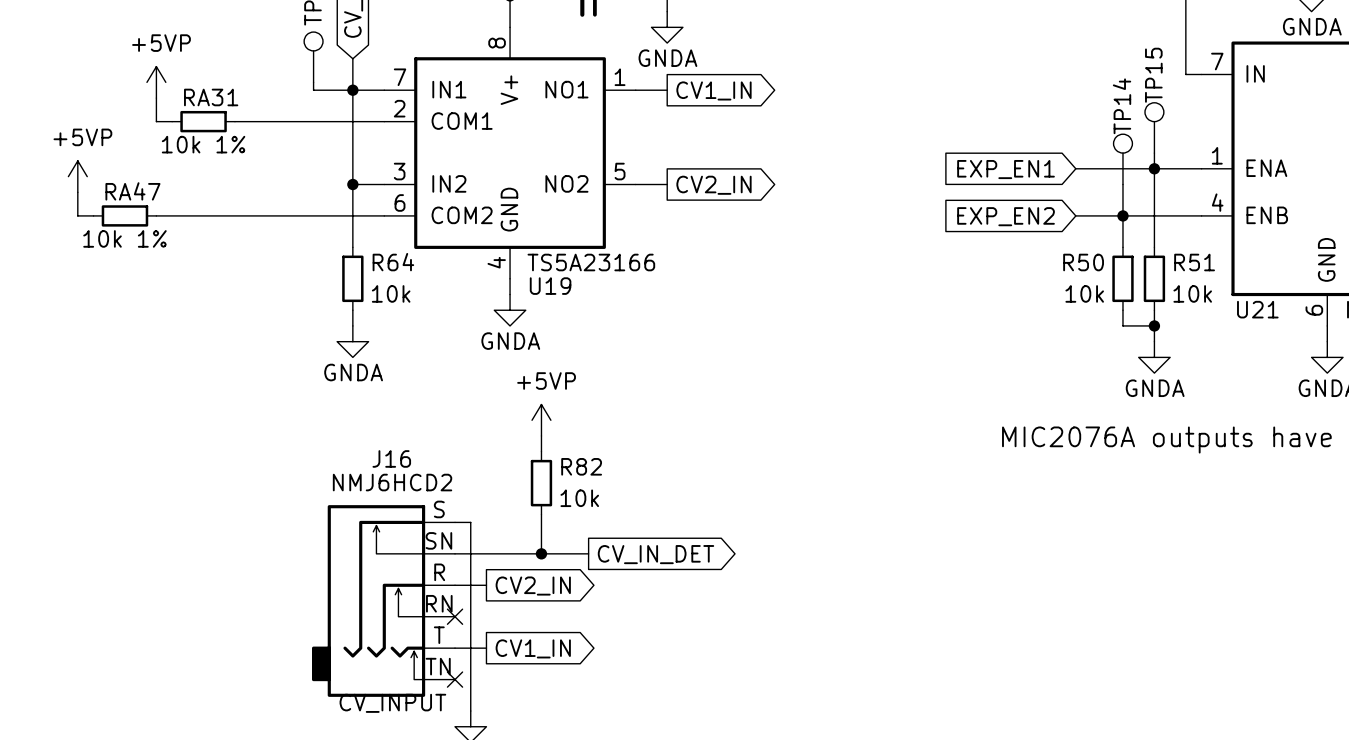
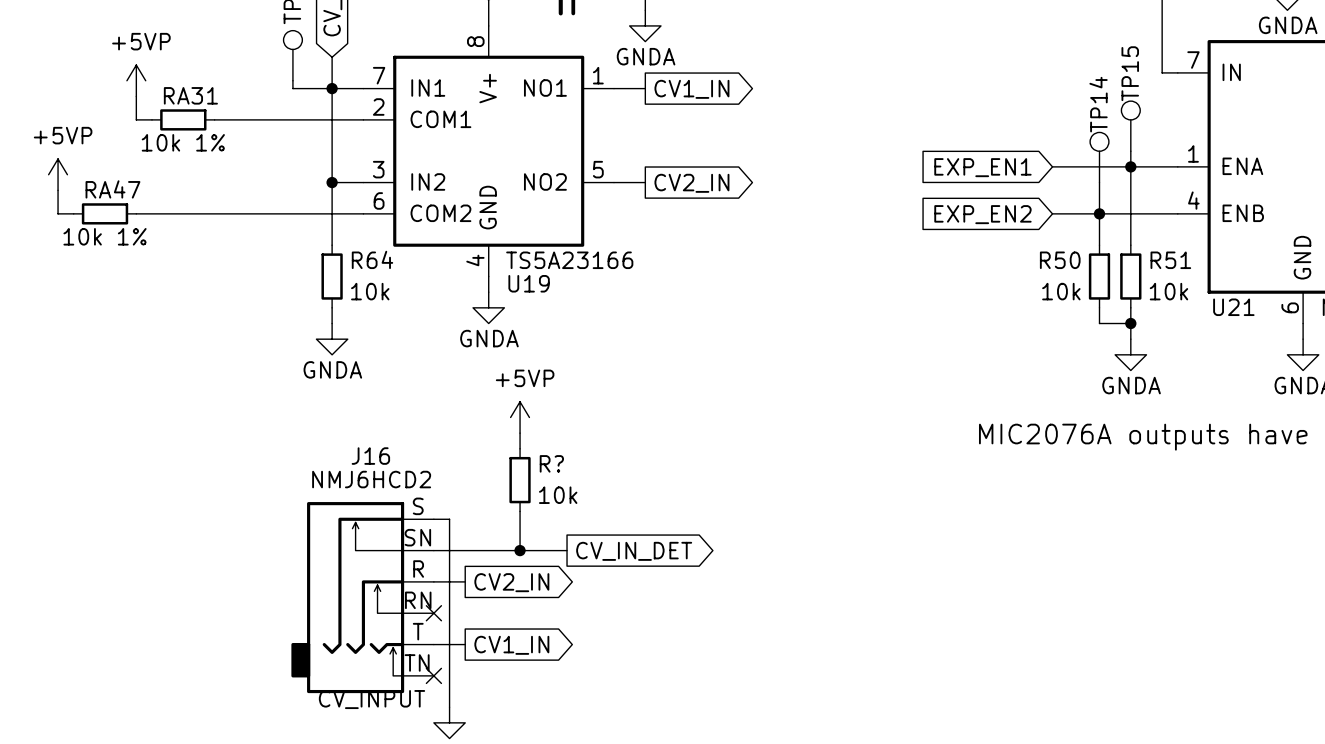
R82 name: R82 (581, 466) -> R? (551, 463)

